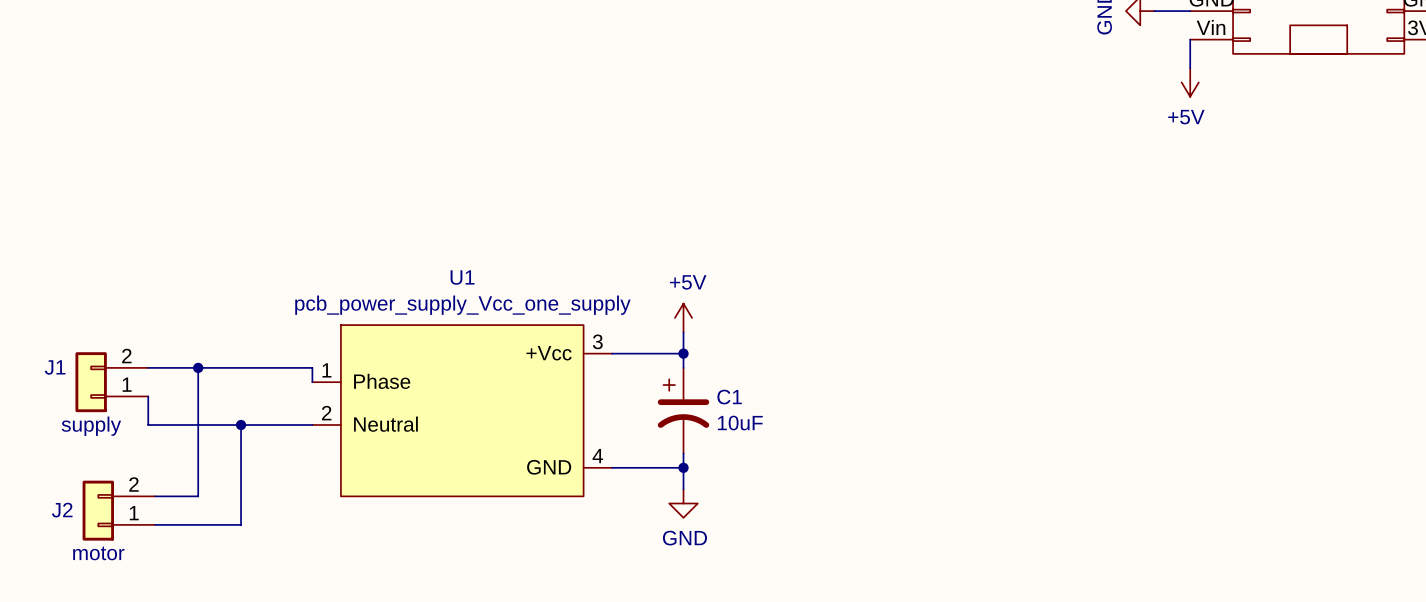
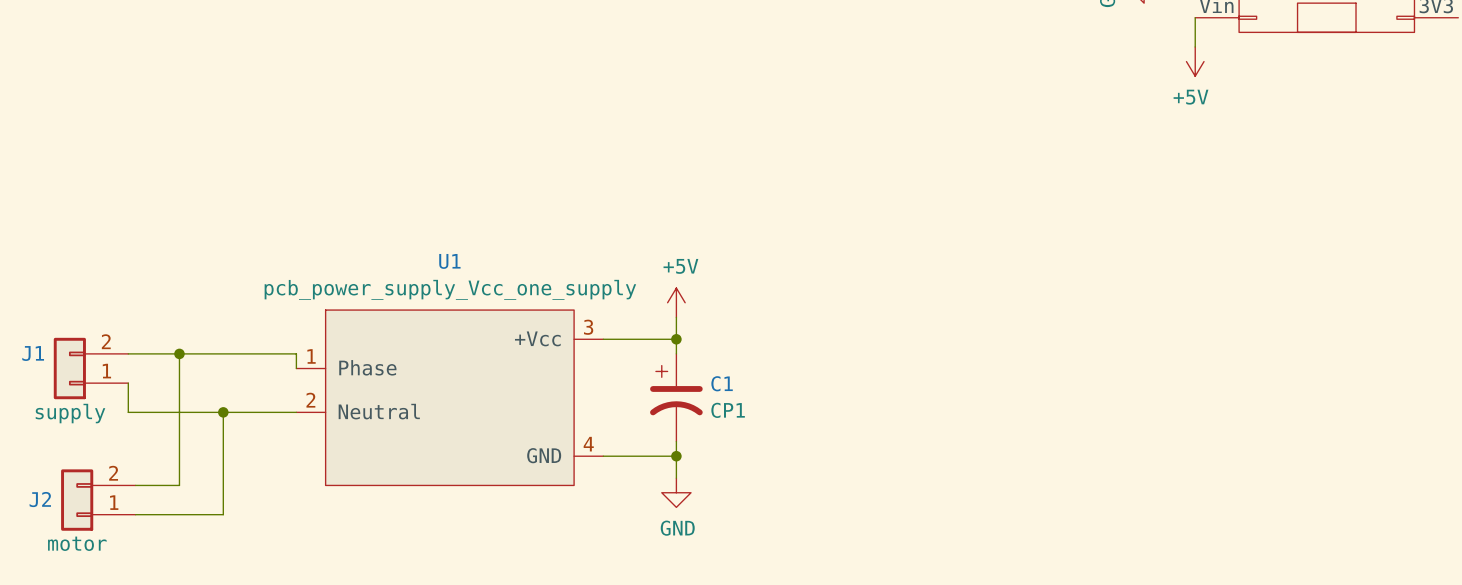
C1 value: 10uF (740, 423) -> CP1 (728, 410)

